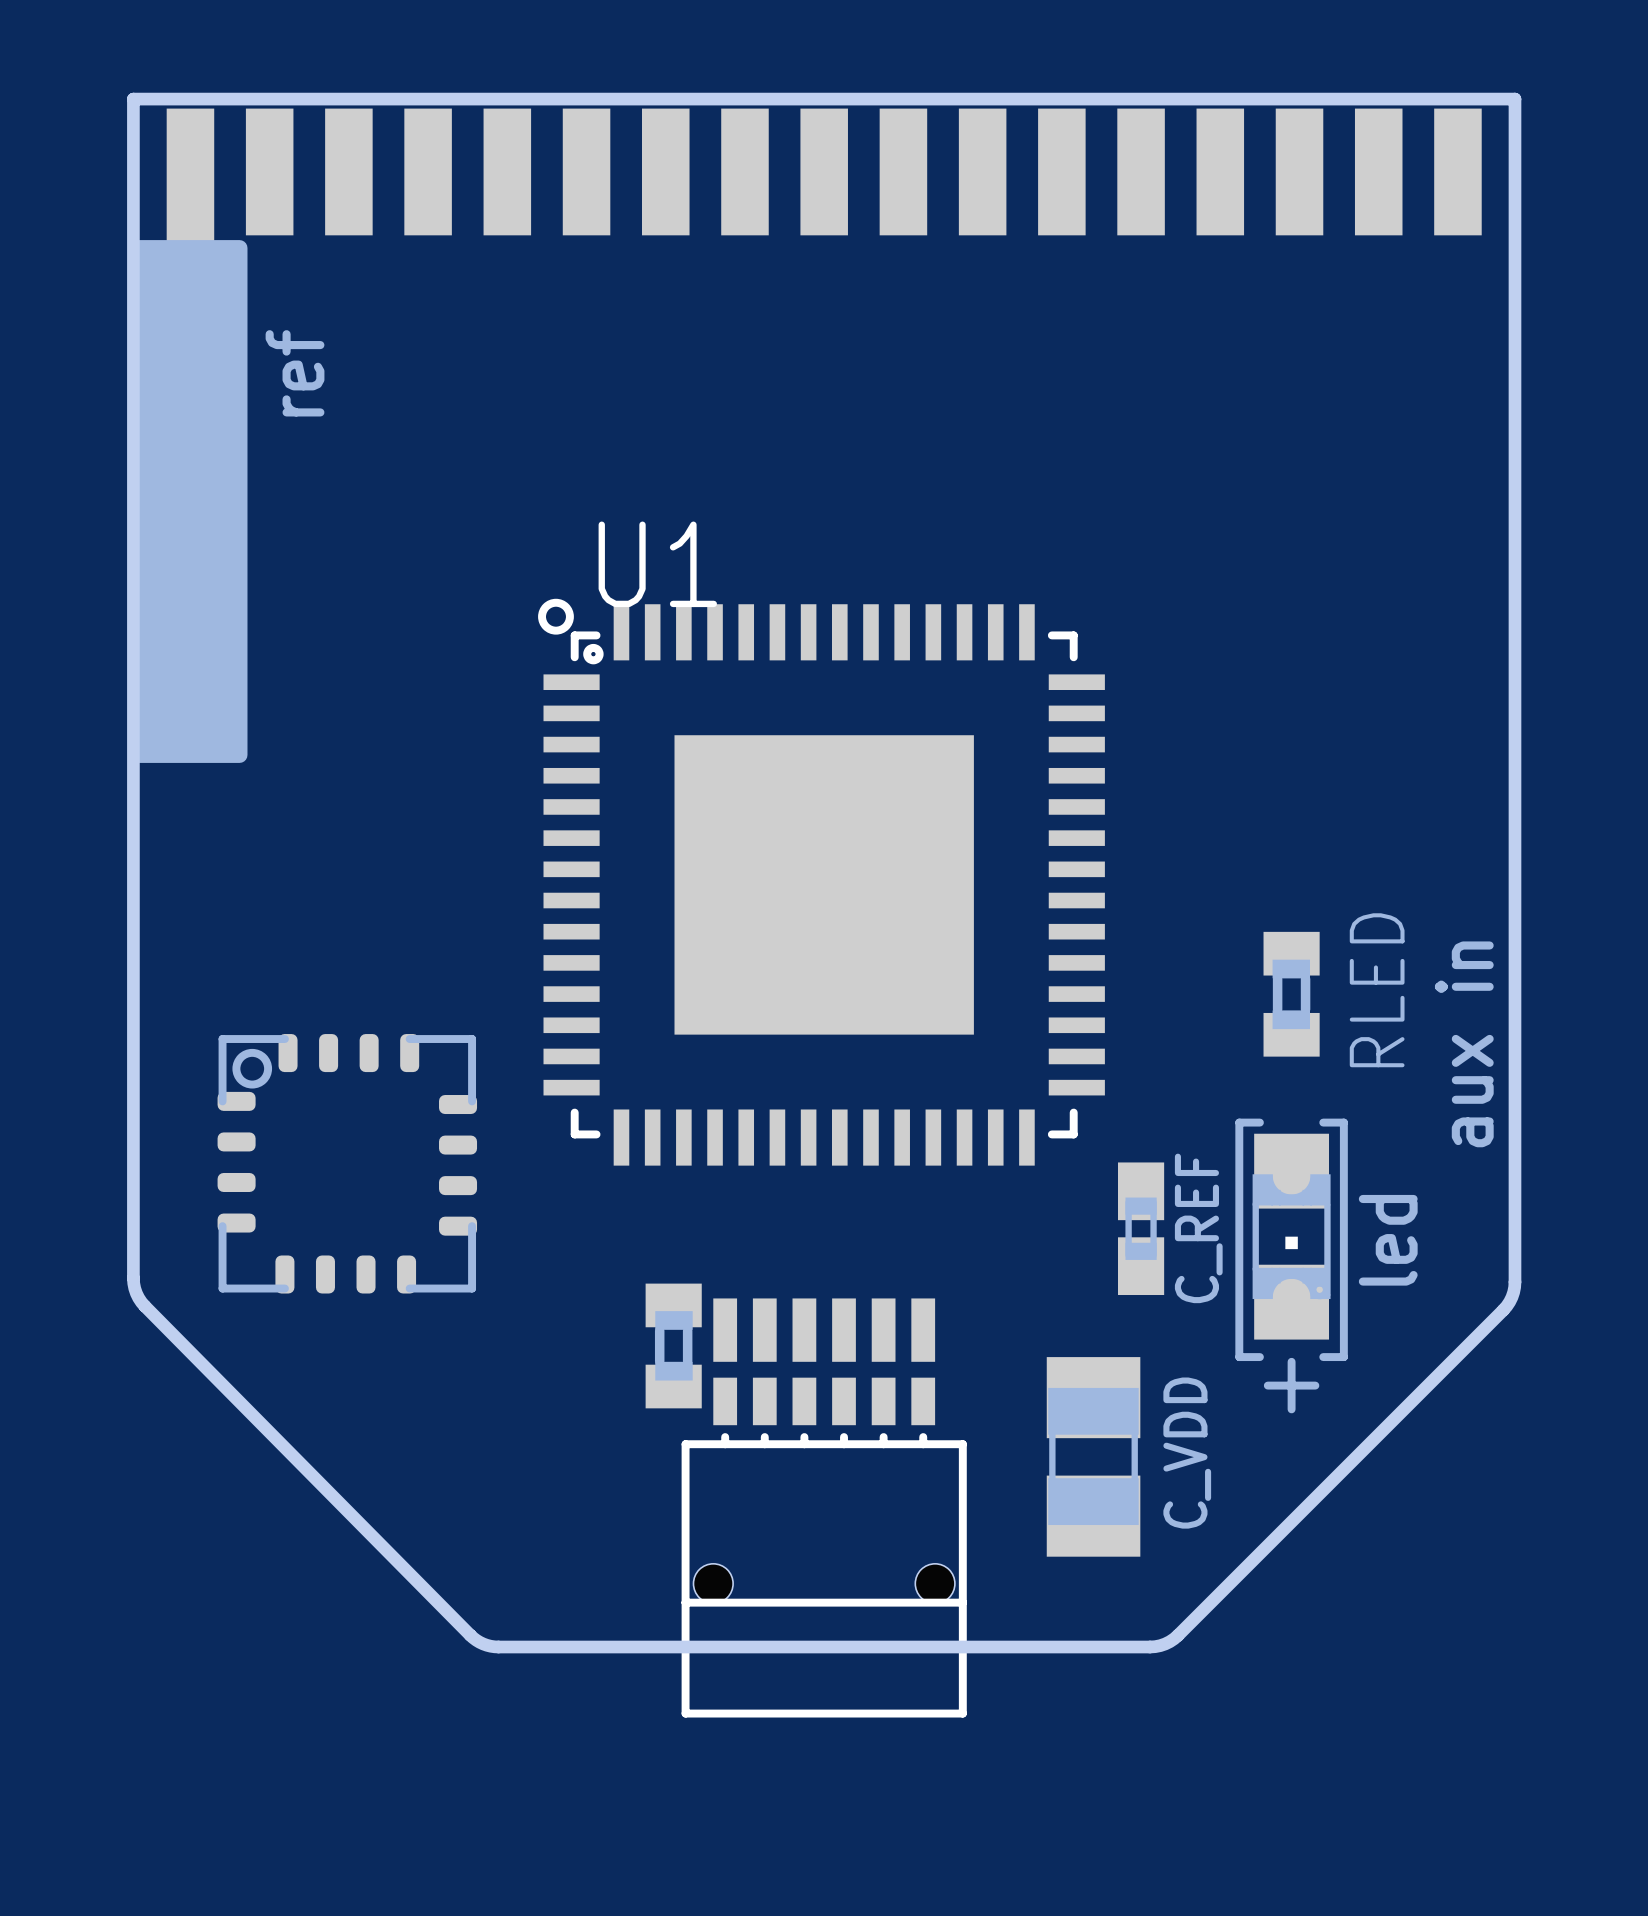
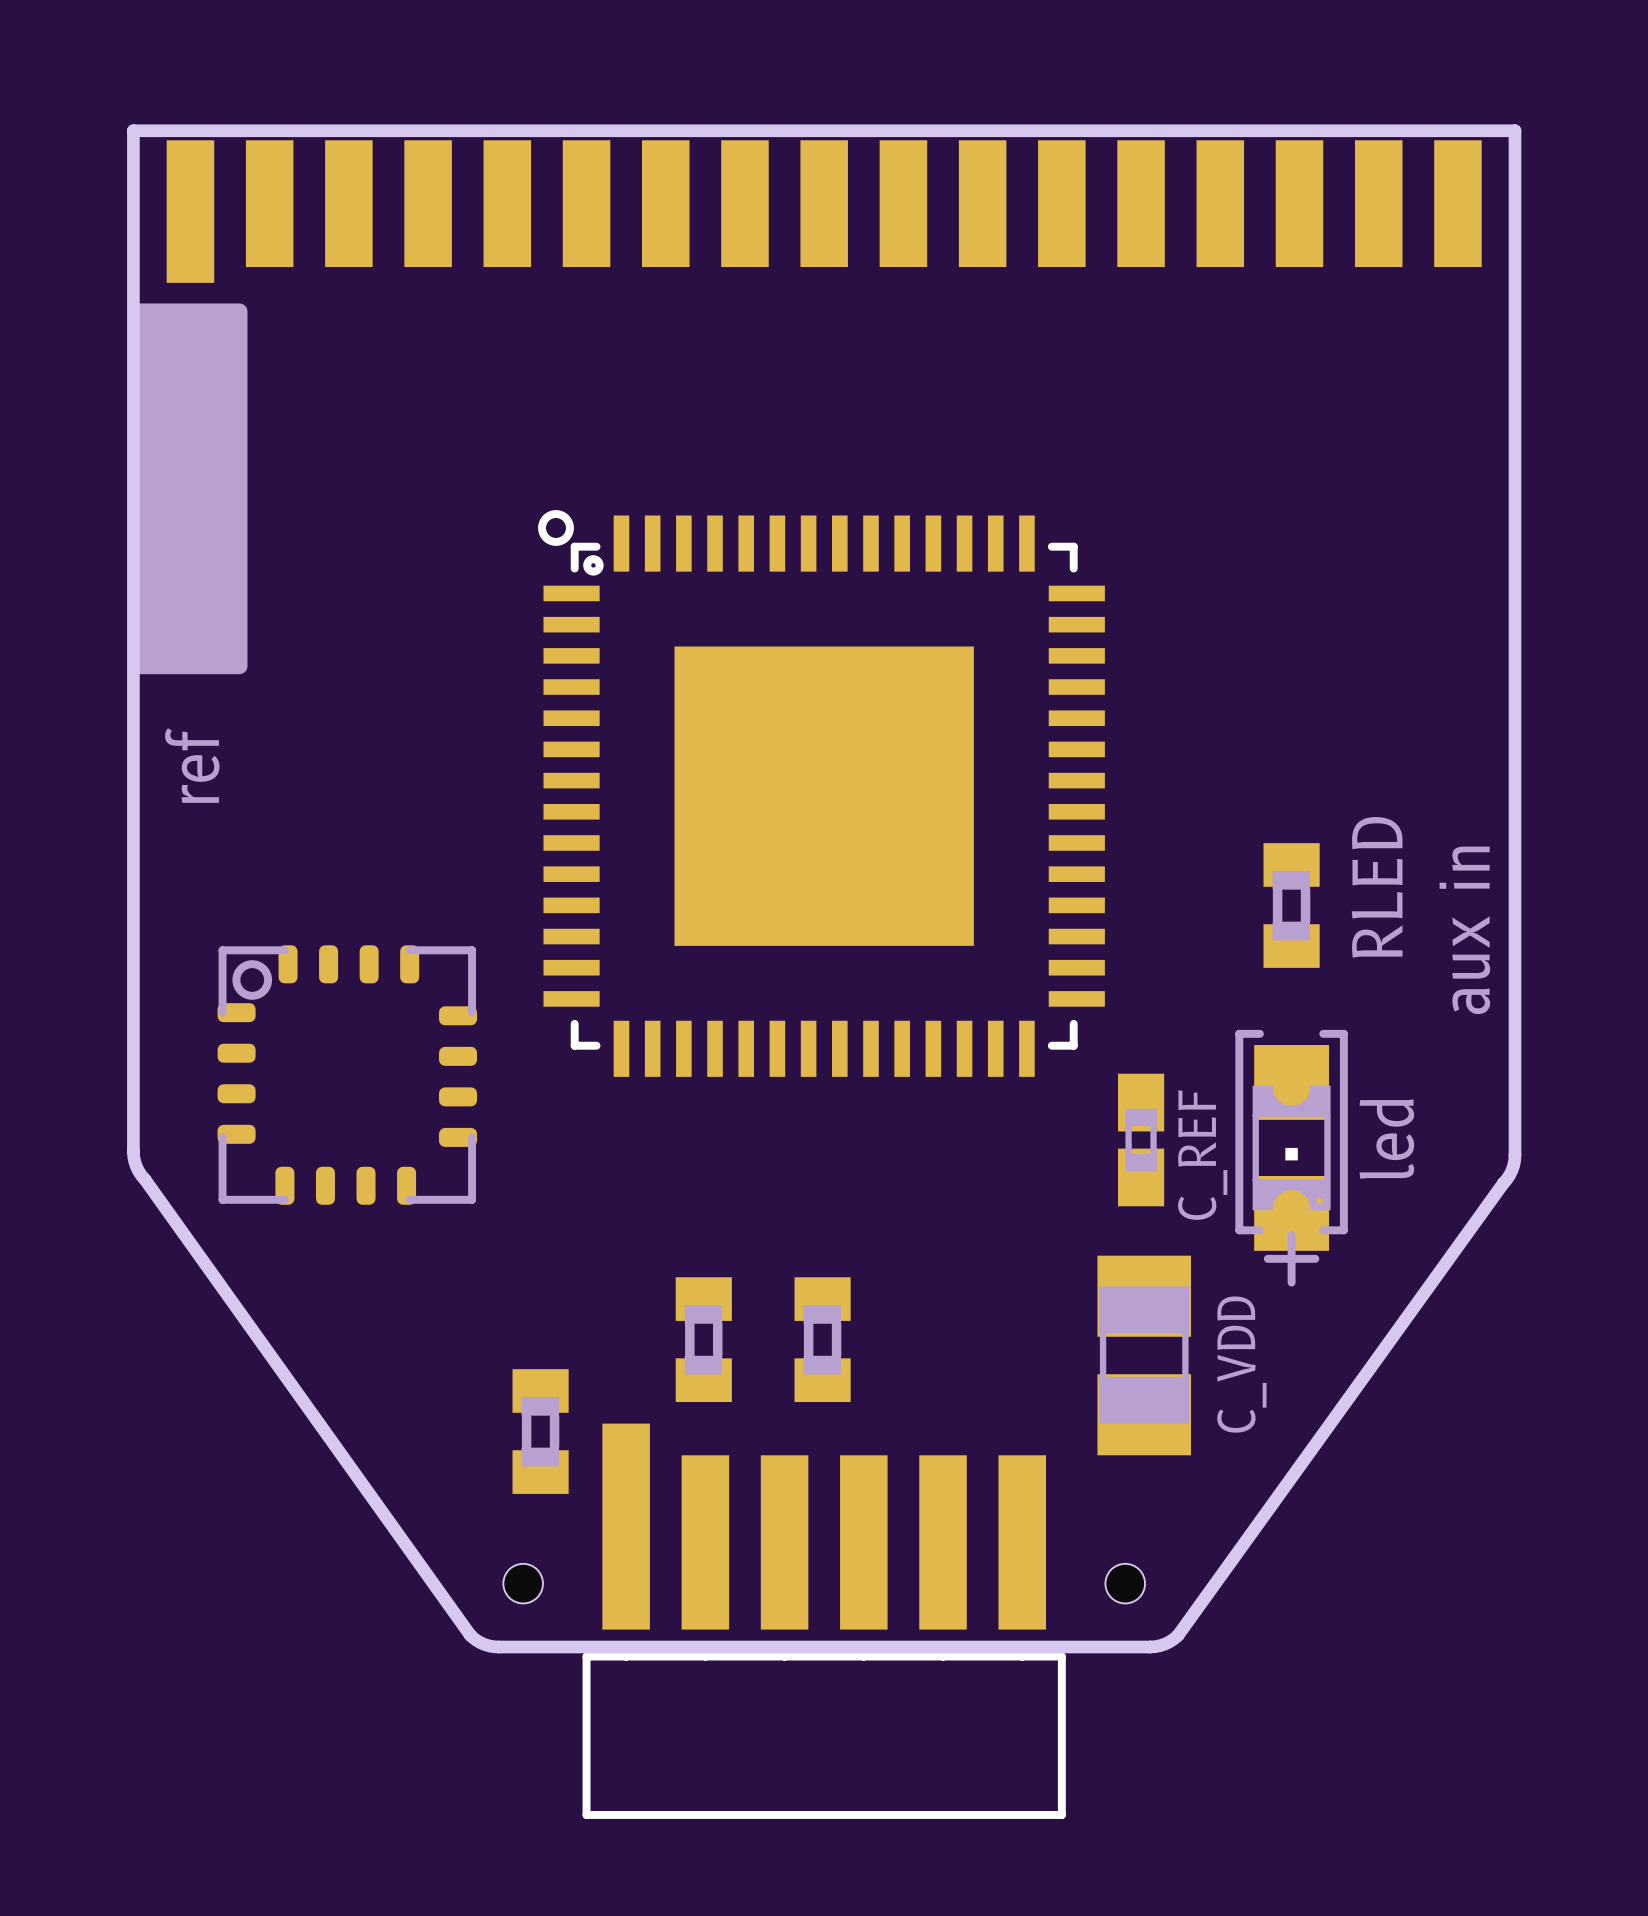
board edge: (133, 130) (133, 99) (1514, 99) (1514, 130) -> (133, 130) (1514, 130)
part position: (824, 179) -> (824, 211)
drawing shape: [130, 240, 248, 763] -> [130, 303, 248, 675]
text position: ref (295, 373) -> ref (192, 765)
part: none -> (821, 793)
U1: (821, 882) -> none
RLED position: (1291, 994) -> (1291, 905)
text position: aux in (1464, 1044) -> aux in (1464, 930)
line: (1239, 1122) (1259, 1122) -> (1239, 1122) (1239, 1033) (1259, 1033)
line: (1323, 1122) (1343, 1122) -> (1323, 1033) (1343, 1033) (1343, 1122)
board edge: (133, 1151) (133, 1278) (134, 1288) (141, 1302) (470, 1635) -> (133, 1151) (134, 1161) (141, 1175) (470, 1635)
board edge: (1514, 1155) (1514, 1282) (1511, 1297) (1506, 1306) (1178, 1635) -> (1514, 1155) (1511, 1170) (1506, 1179) (1178, 1635)
part position: (347, 1163) -> (347, 1075)
C_REF position: (1141, 1228) -> (1141, 1140)
line: (1239, 1230) (1239, 1357) (1259, 1357) -> (1239, 1230) (1259, 1230)
line: (1343, 1230) (1343, 1357) (1323, 1357) -> (1343, 1230) (1323, 1230)
part position: (1291, 1236) -> (1291, 1147)
text position: led (1388, 1240) -> led (1386, 1139)
part: none -> (822, 1339)
part position: (673, 1345) -> (703, 1339)
line: (1291, 1361) (1291, 1409) -> (1291, 1235) (1291, 1282)
line: (1267, 1385) (1315, 1385) -> (1267, 1258) (1315, 1258)
part: none -> (540, 1431)
C_VDD position: (1093, 1456) -> (1144, 1355)
part: (824, 1507) -> none
hole position: (713, 1583) -> (523, 1583)
hole position: (935, 1583) -> (1125, 1583)
part: none -> (824, 1621)

